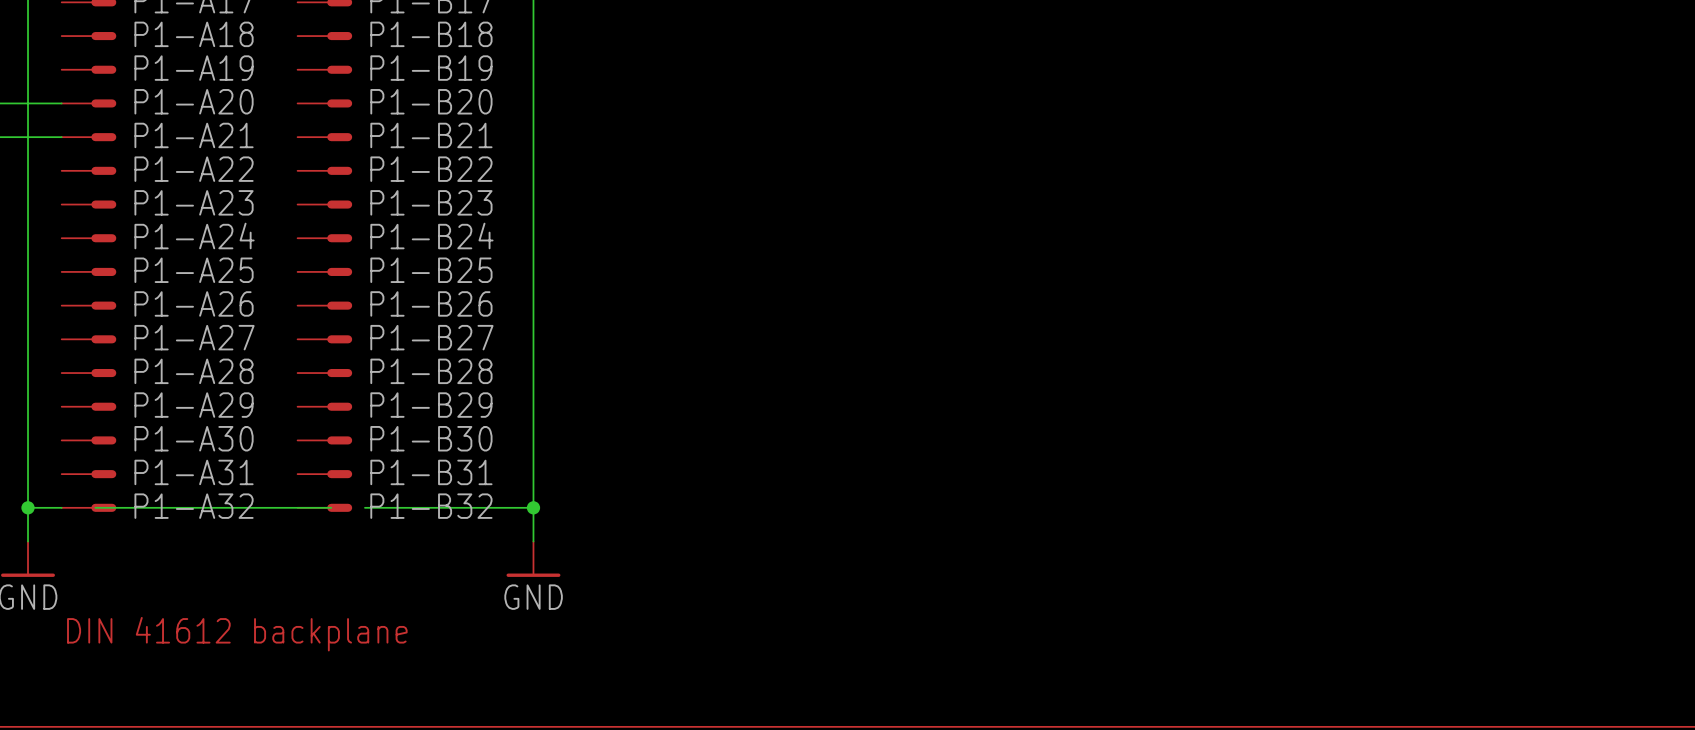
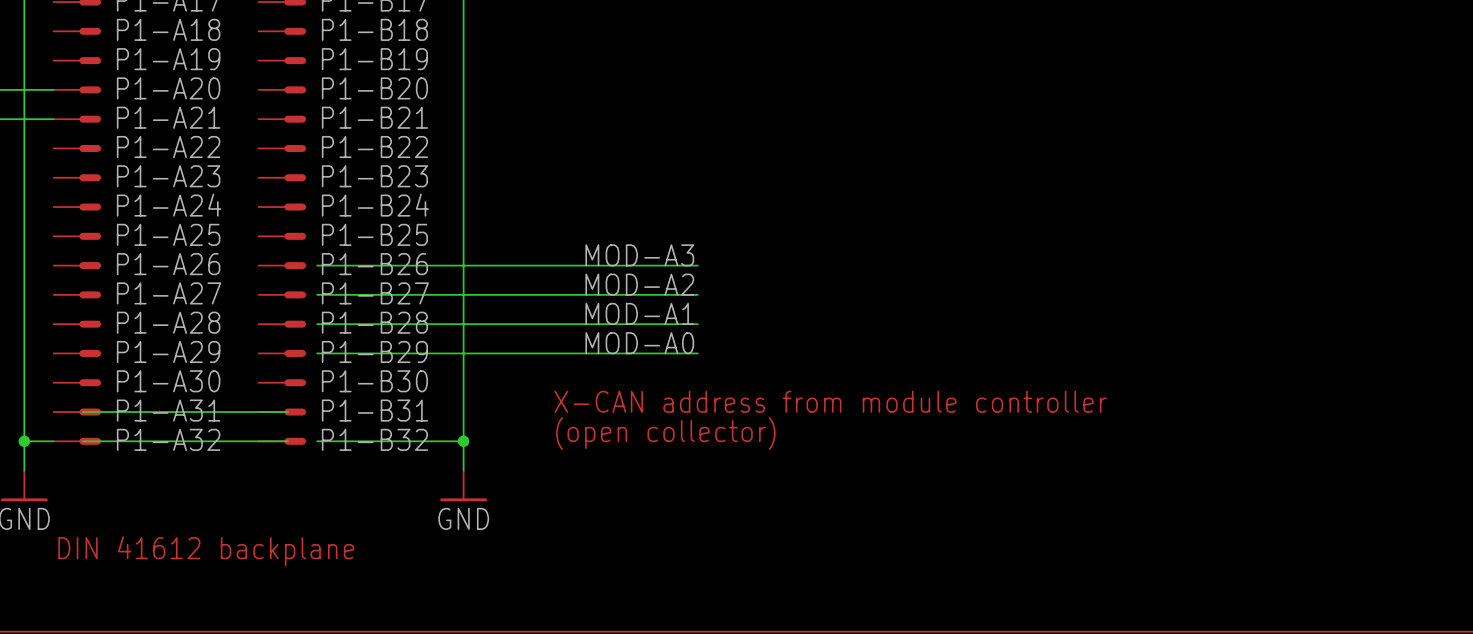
label: none -> MOD-A3 (639, 255)
wire: none -> (317, 265) (697, 265)
label: none -> MOD-A2 (639, 284)
wire: none -> (317, 294) (697, 294)
label: none -> MOD-A1 (639, 313)
wire: none -> (317, 324) (697, 324)
label: none -> MOD-A0 (639, 343)
wire: none -> (317, 353) (697, 353)
text: none -> X-CAN address from module controller (830, 401)
wire: none -> (82, 412) (287, 412)
text: none -> (open collector) (665, 433)

